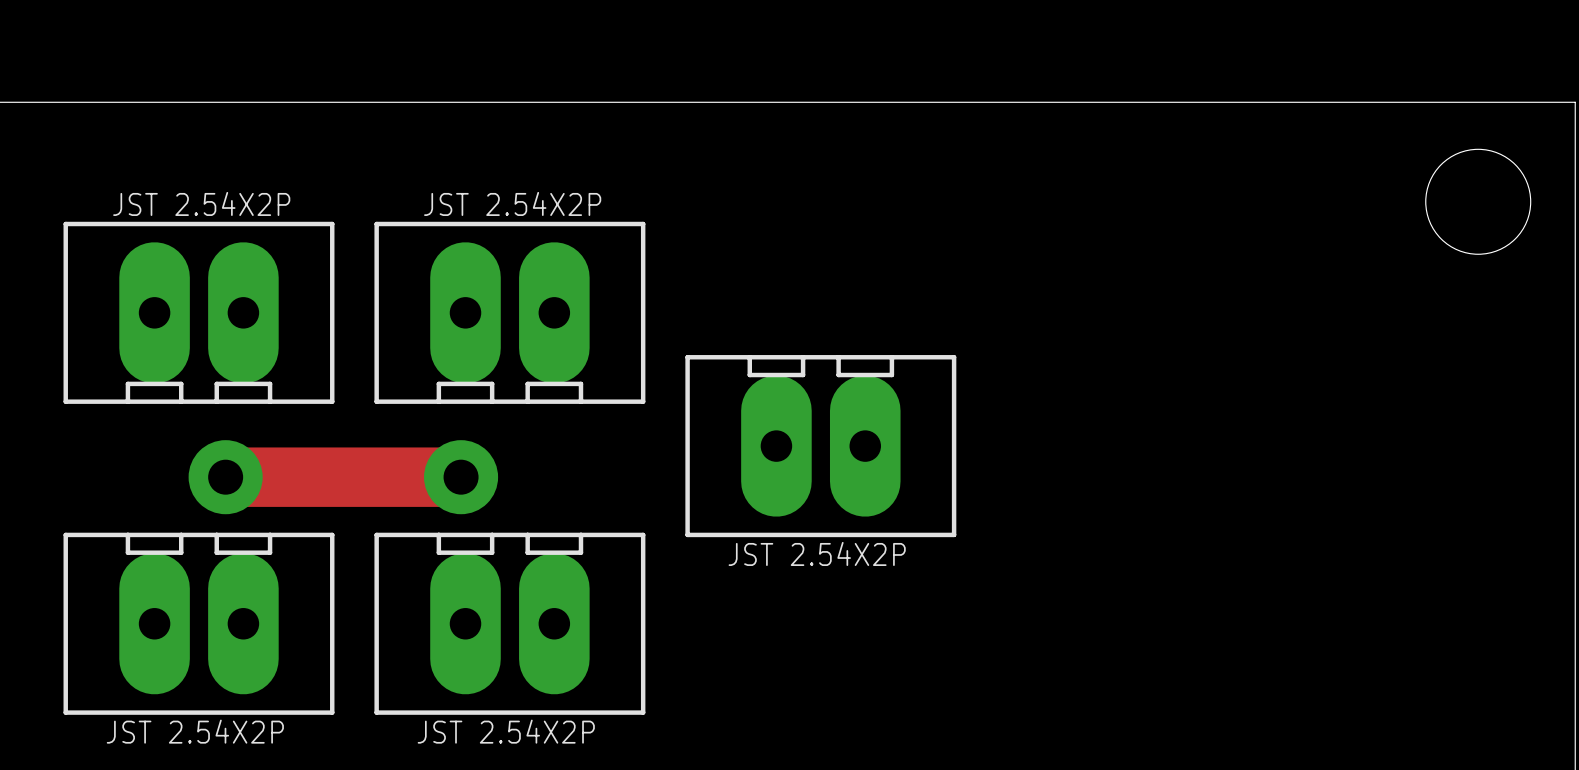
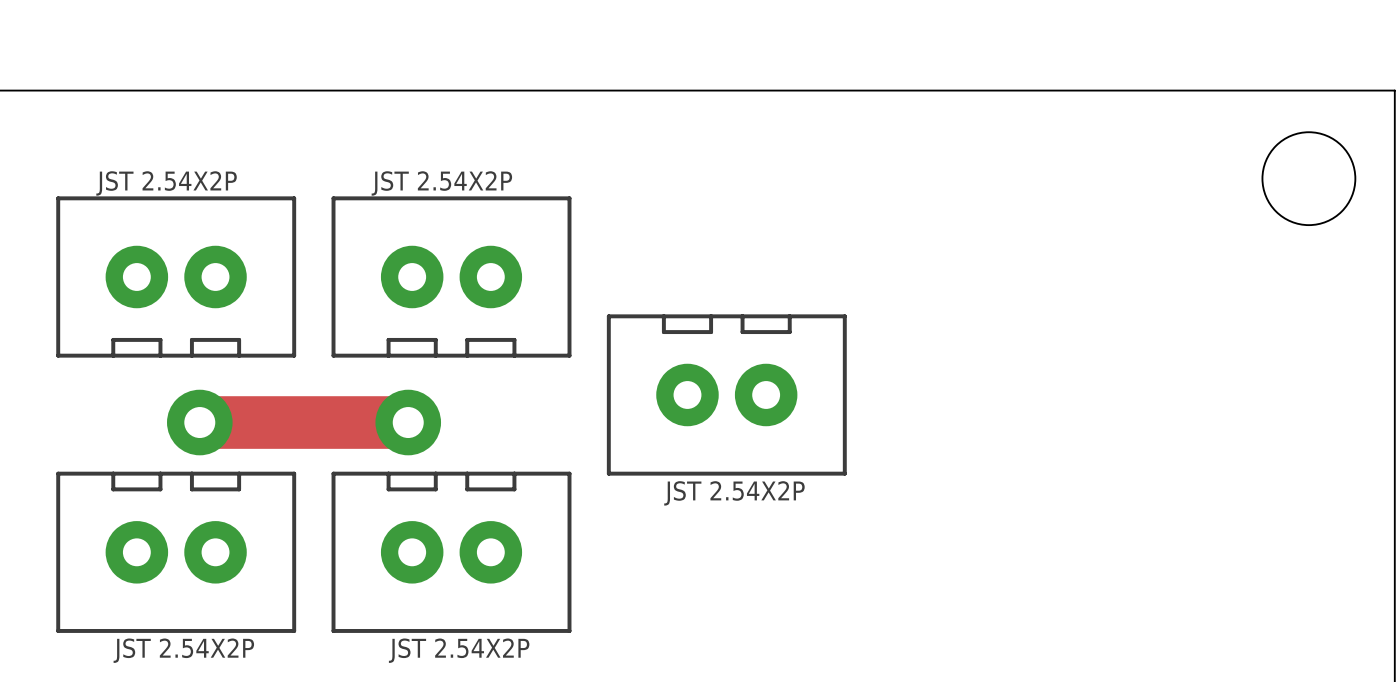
part footprint: [63, 221, 335, 404] -> [56, 196, 297, 358]
part footprint: [374, 221, 646, 404] -> [331, 196, 572, 358]
part footprint: [685, 355, 957, 538] -> [606, 314, 847, 476]
part footprint: [63, 532, 335, 715] -> [56, 471, 297, 633]
part footprint: [374, 532, 646, 715] -> [331, 471, 572, 633]

